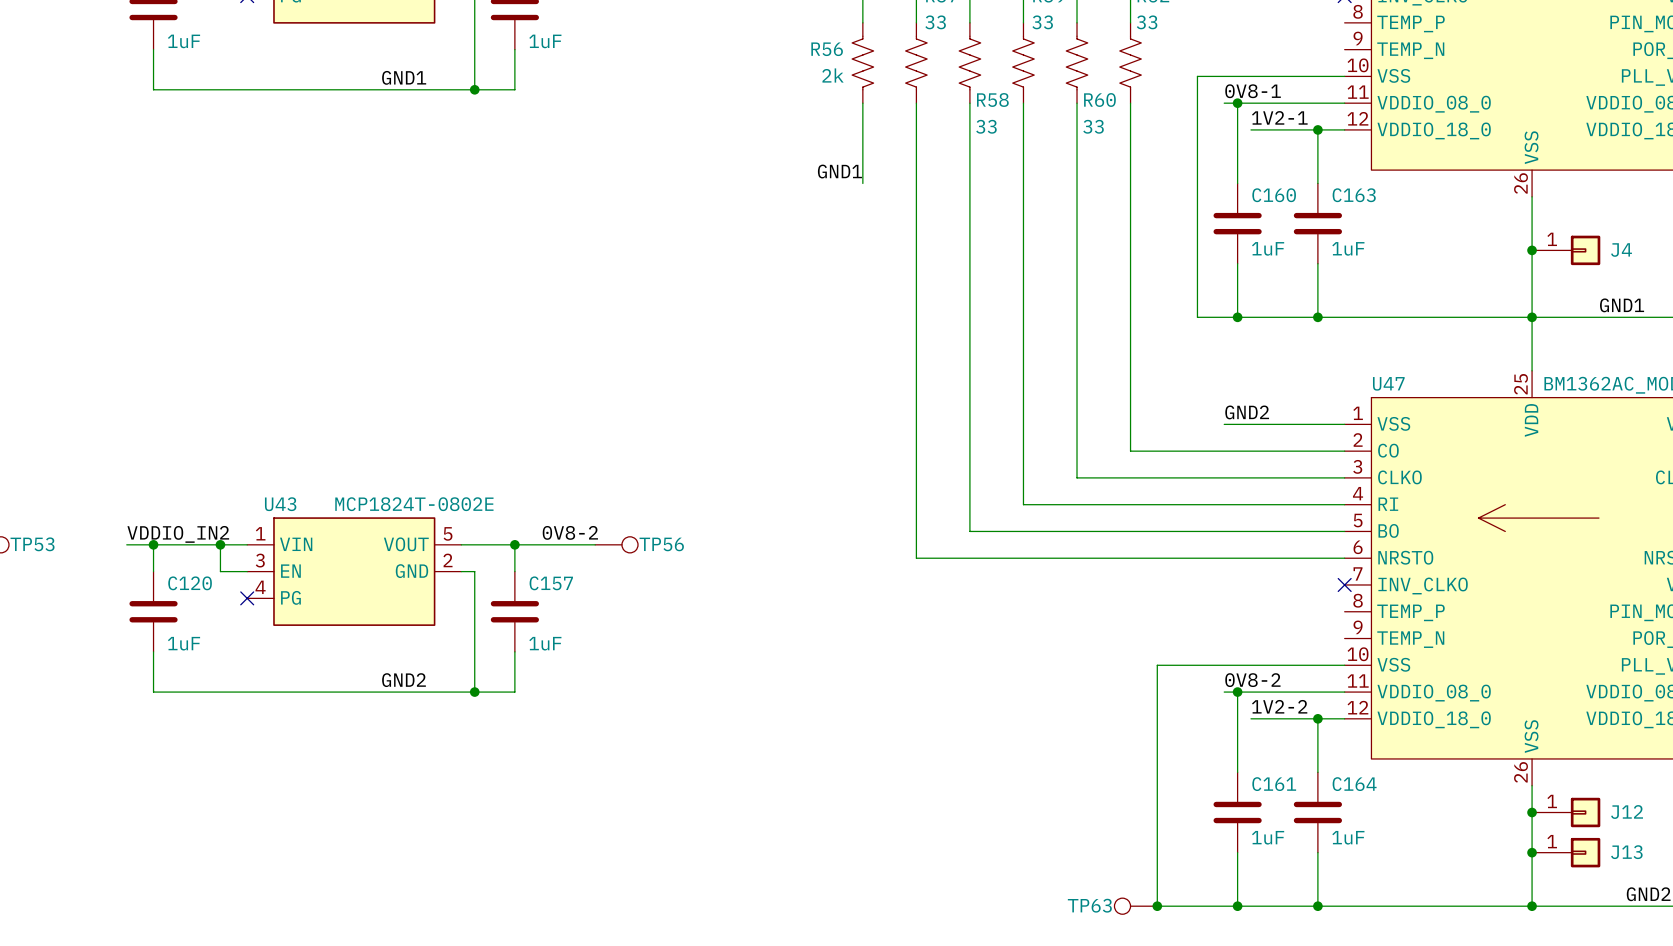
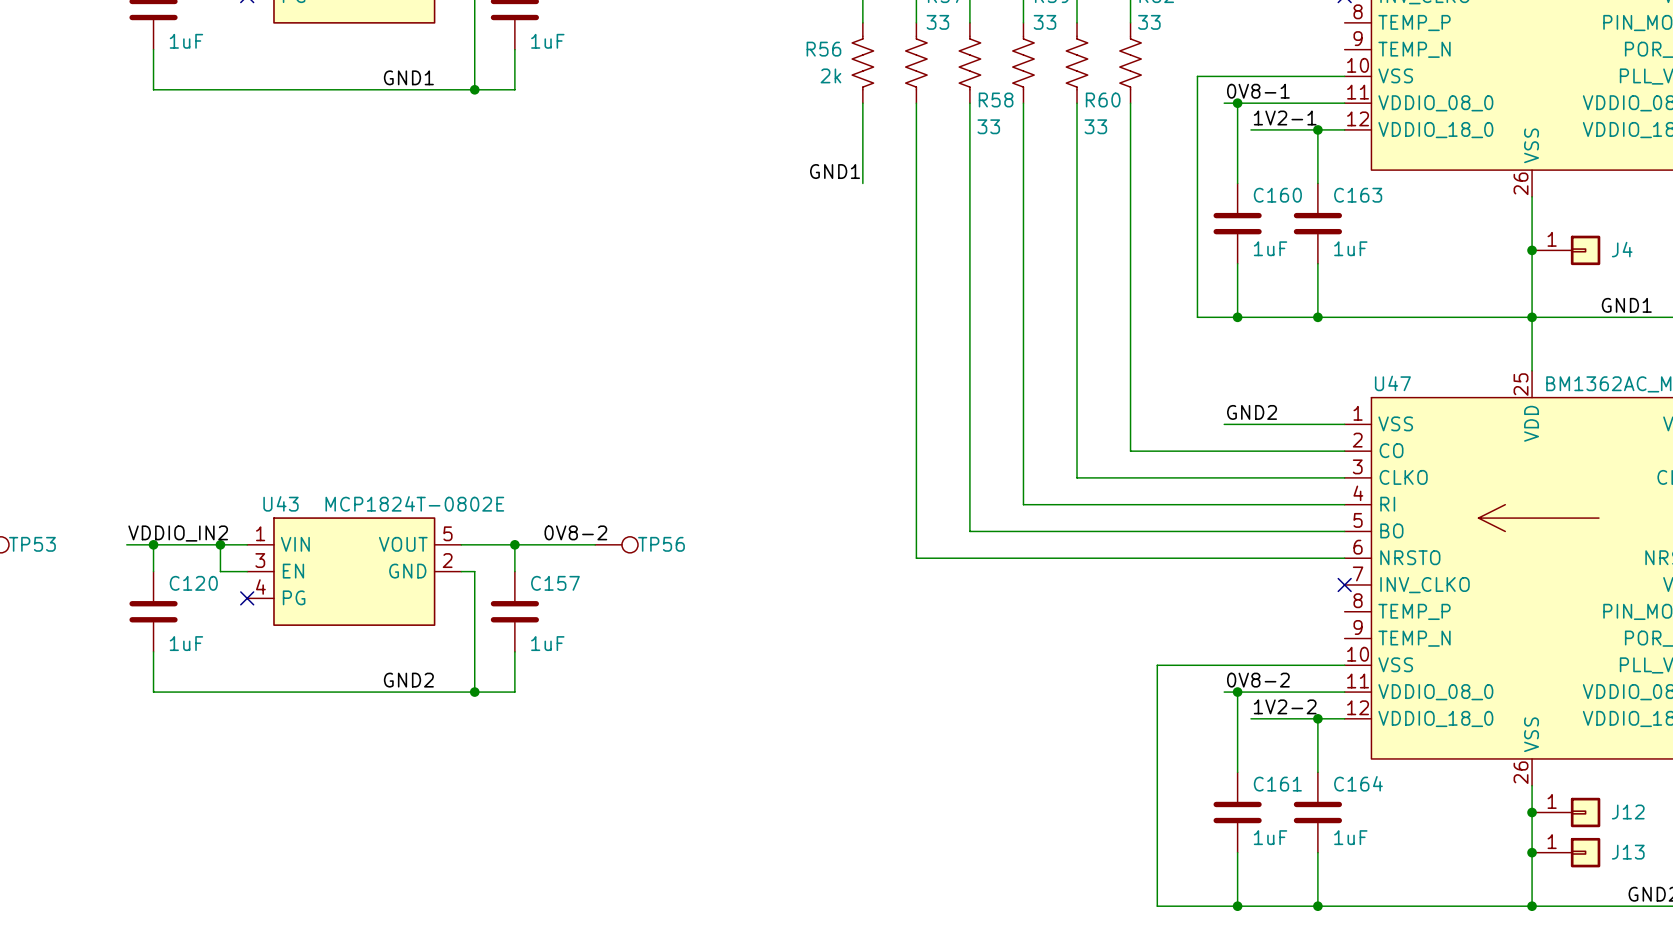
TP63: (1135, 906) -> none
junction: (1157, 906) -> none

